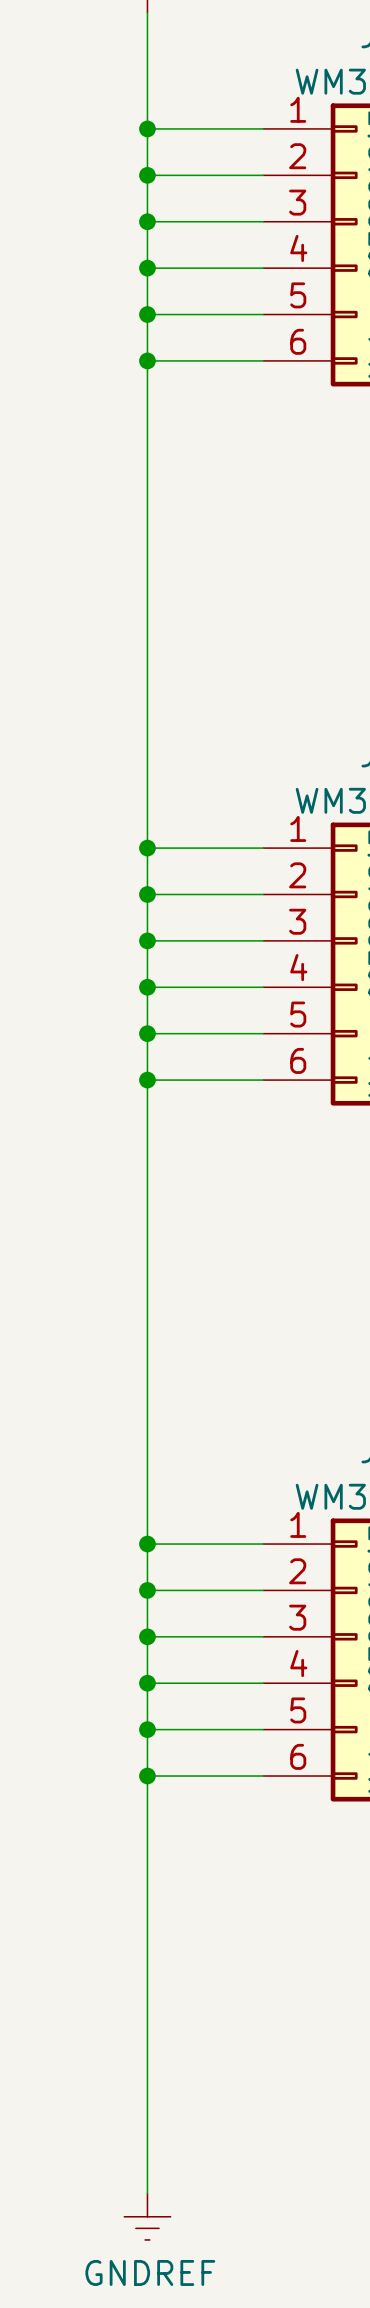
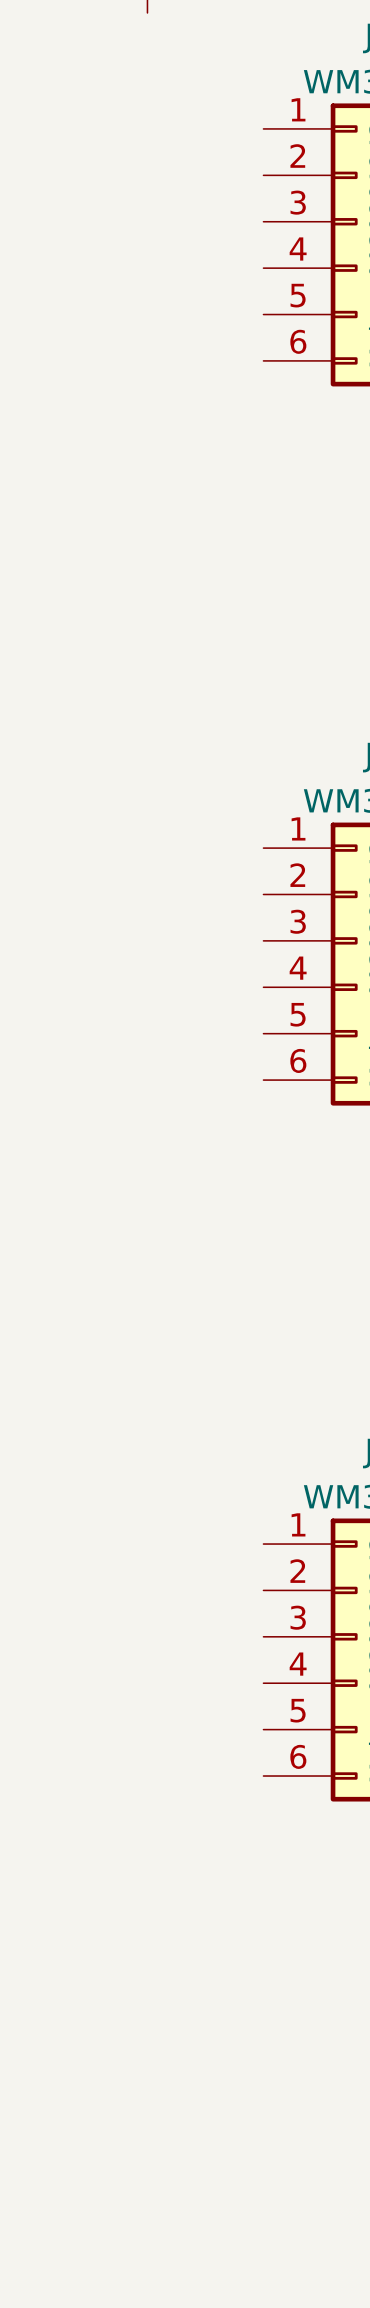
wire: (147, 12) (147, 2193) -> none
wire: (147, 128) (263, 128) -> none
junction: (147, 128) -> none
wire: (147, 175) (263, 175) -> none
junction: (147, 175) -> none
wire: (147, 221) (263, 221) -> none
junction: (147, 221) -> none
wire: (147, 268) (263, 268) -> none
junction: (147, 268) -> none
wire: (147, 314) (263, 314) -> none
junction: (147, 314) -> none
wire: (147, 360) (263, 360) -> none
junction: (147, 360) -> none
wire: (147, 848) (263, 848) -> none
junction: (147, 848) -> none
wire: (147, 894) (263, 894) -> none
junction: (147, 894) -> none
wire: (147, 940) (263, 940) -> none
junction: (147, 940) -> none
wire: (147, 987) (263, 987) -> none
junction: (147, 987) -> none
wire: (147, 1033) (263, 1033) -> none
junction: (147, 1033) -> none
wire: (147, 1080) (263, 1080) -> none
junction: (147, 1080) -> none
wire: (147, 1544) (263, 1544) -> none
junction: (147, 1544) -> none
wire: (147, 1590) (263, 1590) -> none
junction: (147, 1590) -> none
wire: (147, 1636) (263, 1636) -> none
junction: (147, 1636) -> none
wire: (147, 1683) (263, 1683) -> none
junction: (147, 1683) -> none
wire: (147, 1729) (263, 1729) -> none
junction: (147, 1729) -> none
wire: (147, 1776) (263, 1776) -> none
junction: (147, 1776) -> none
power symbol: GNDREF (147, 2216) -> none

